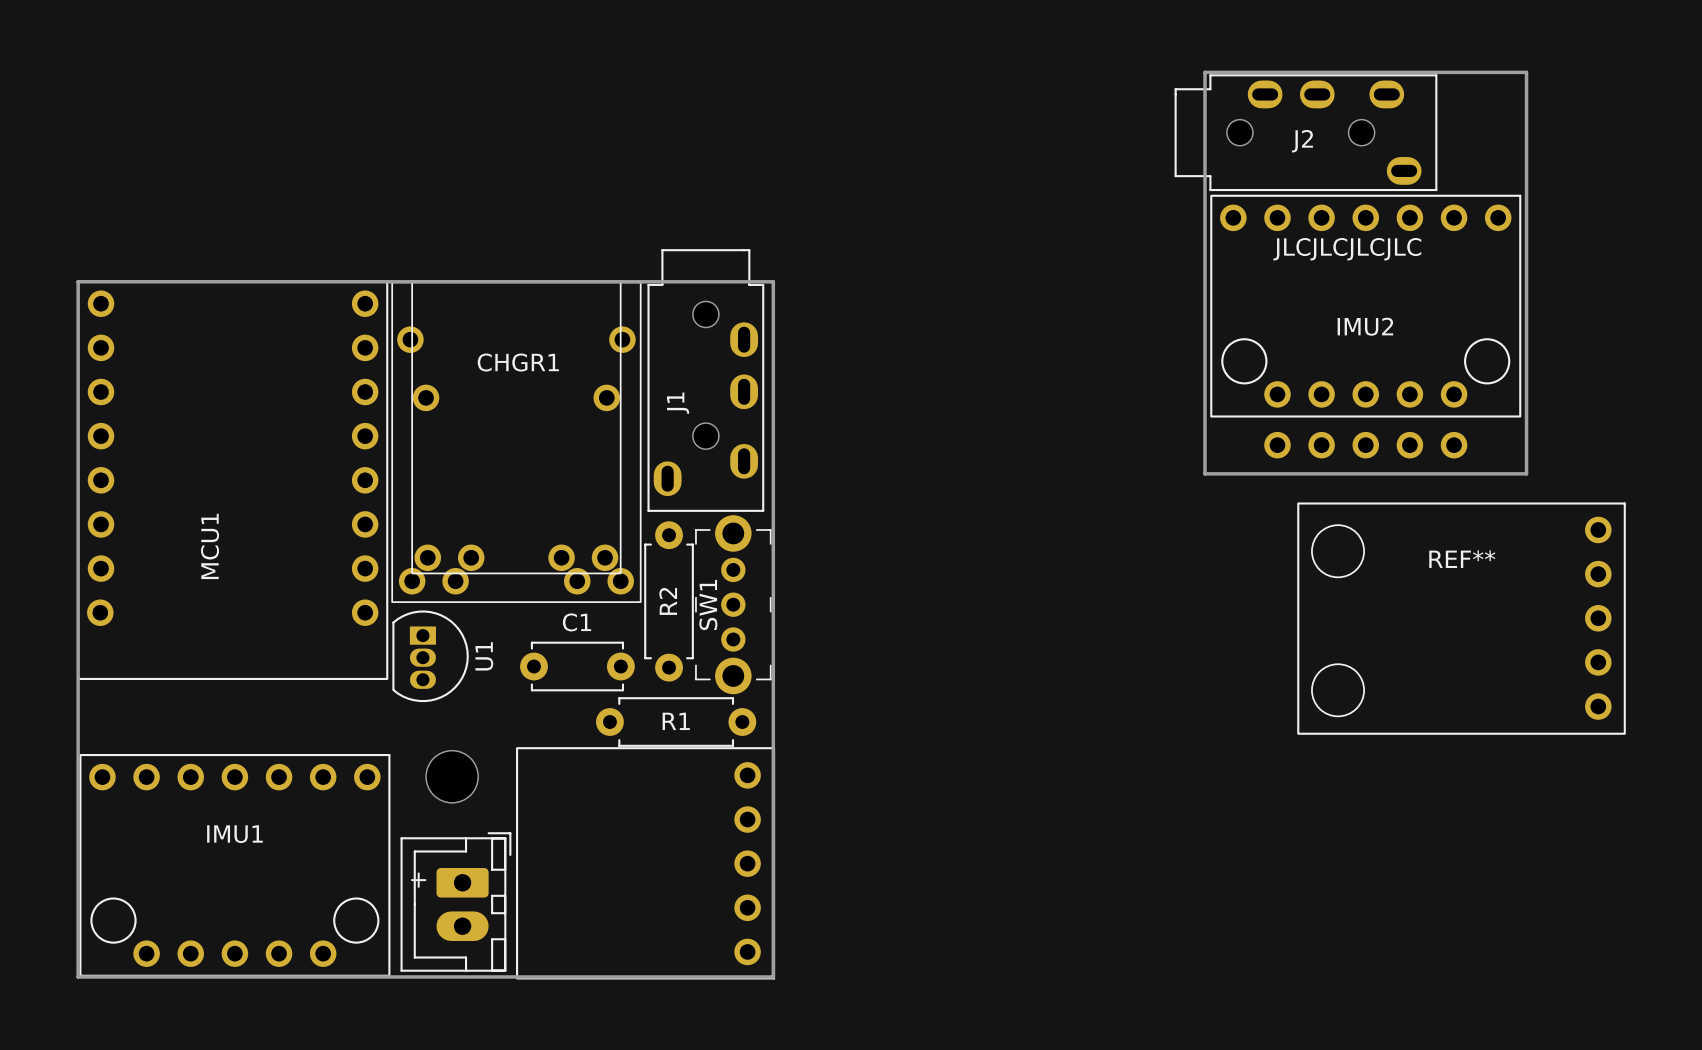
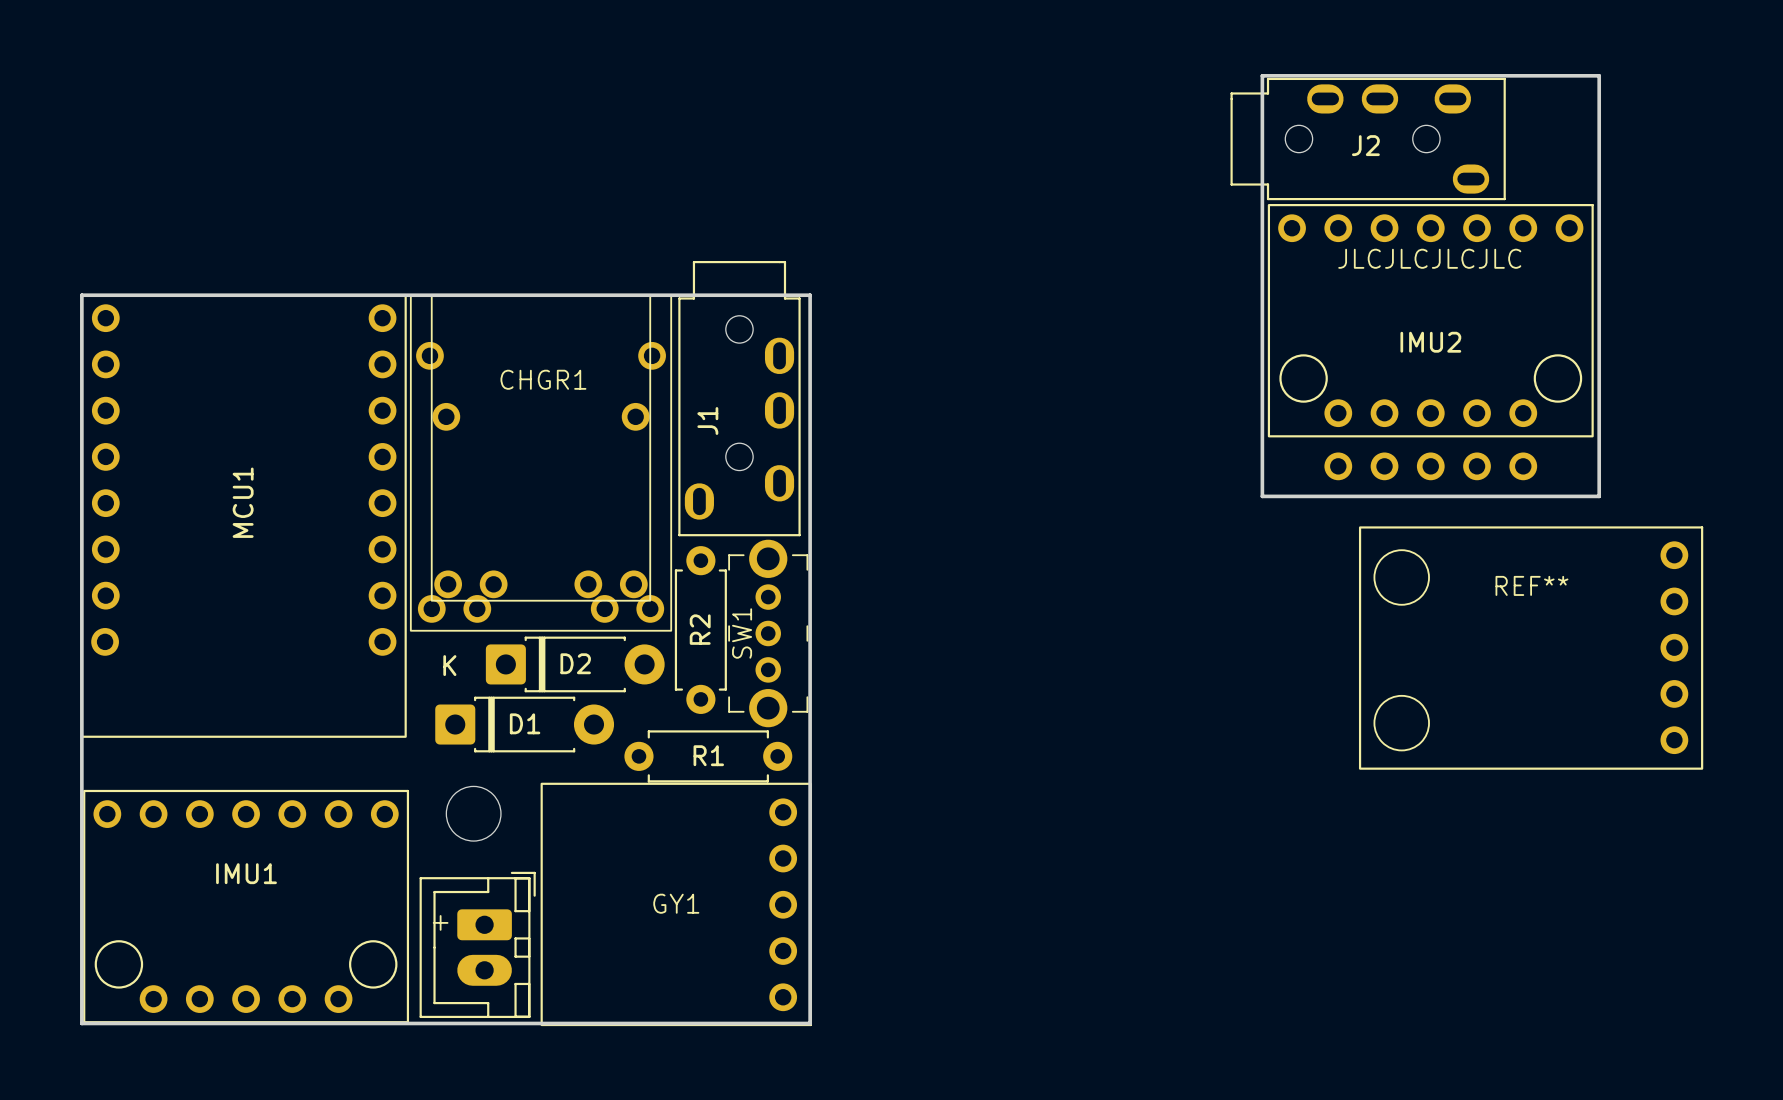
MCU1 footprint: [77, 280, 389, 680] -> [80, 293, 407, 738]
MCU1 name position: MCU1 (210, 546) -> MCU1 (243, 502)
D2: none -> (575, 664)
U1: (430, 656) -> none
C1: (577, 666) -> none
D1: none -> (524, 724)
GY1 name: none -> GY1 (676, 903)

